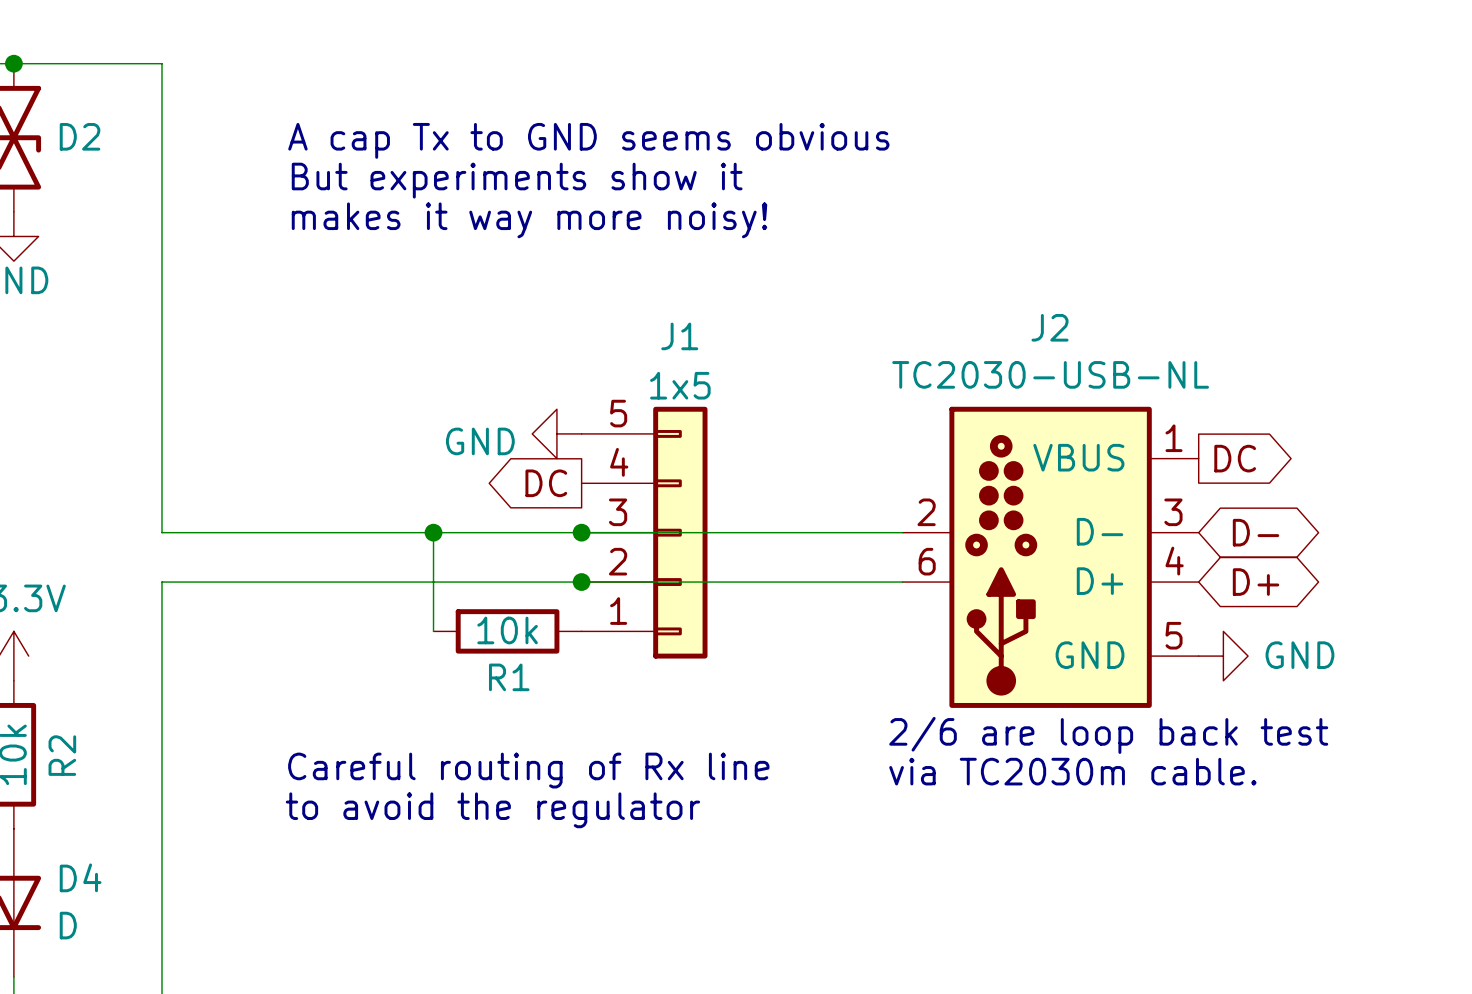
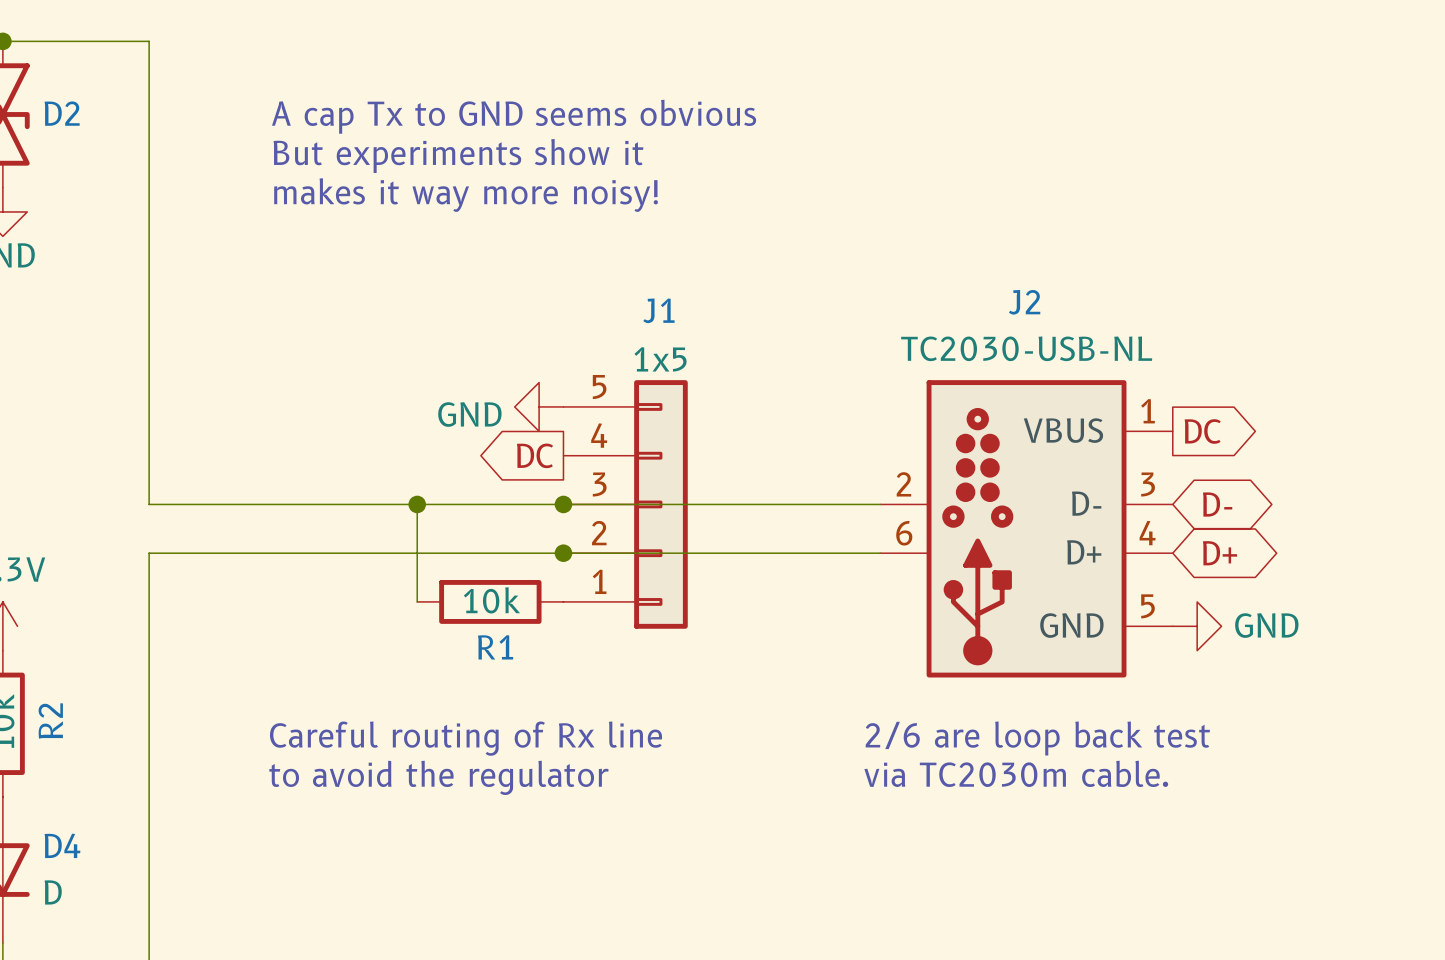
text position: 2/6 are loop back test (1108, 735) -> 2/6 are loop back test (1037, 738)
text position: via TC2030m cable. (1072, 771) -> via TC2030m cable. (1016, 773)

